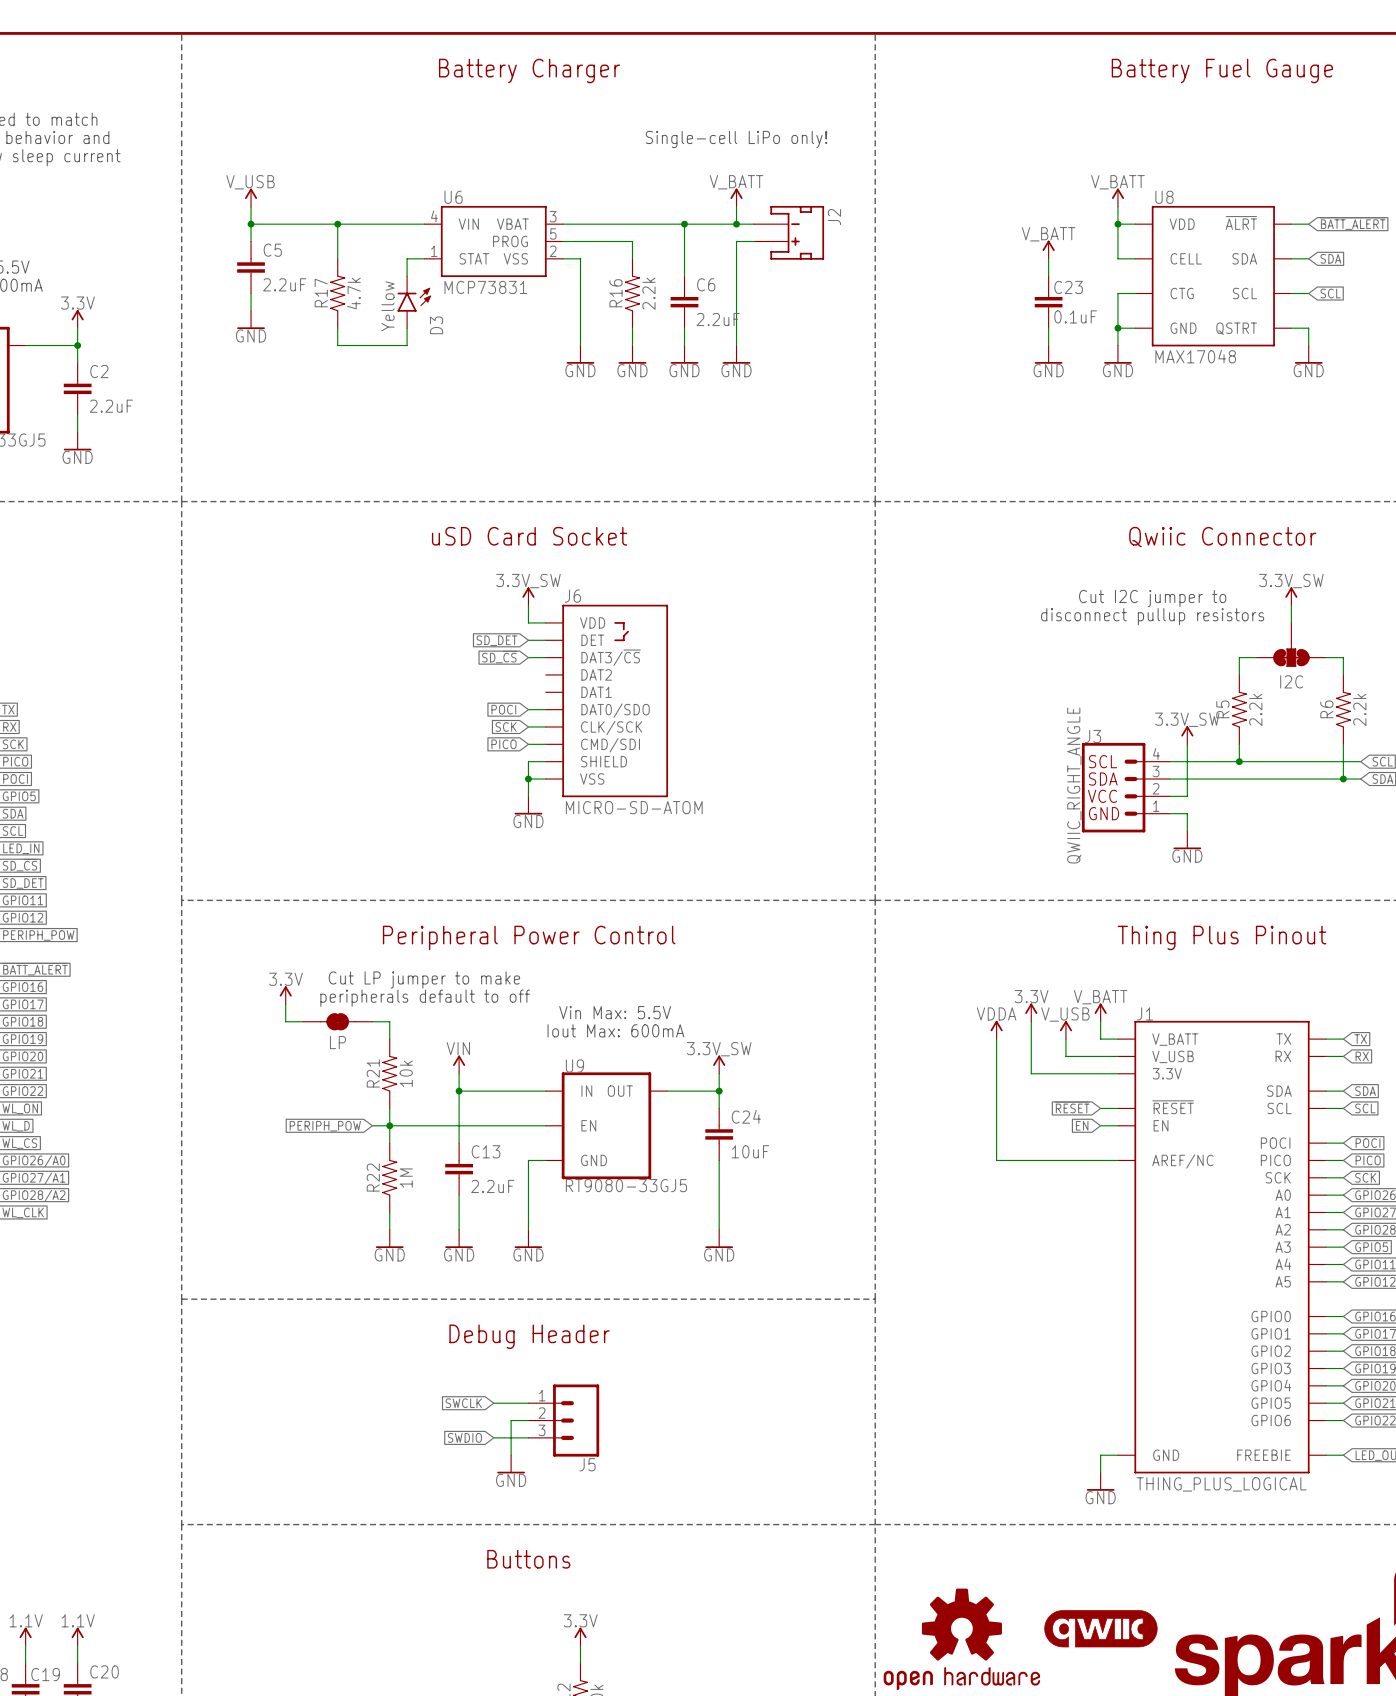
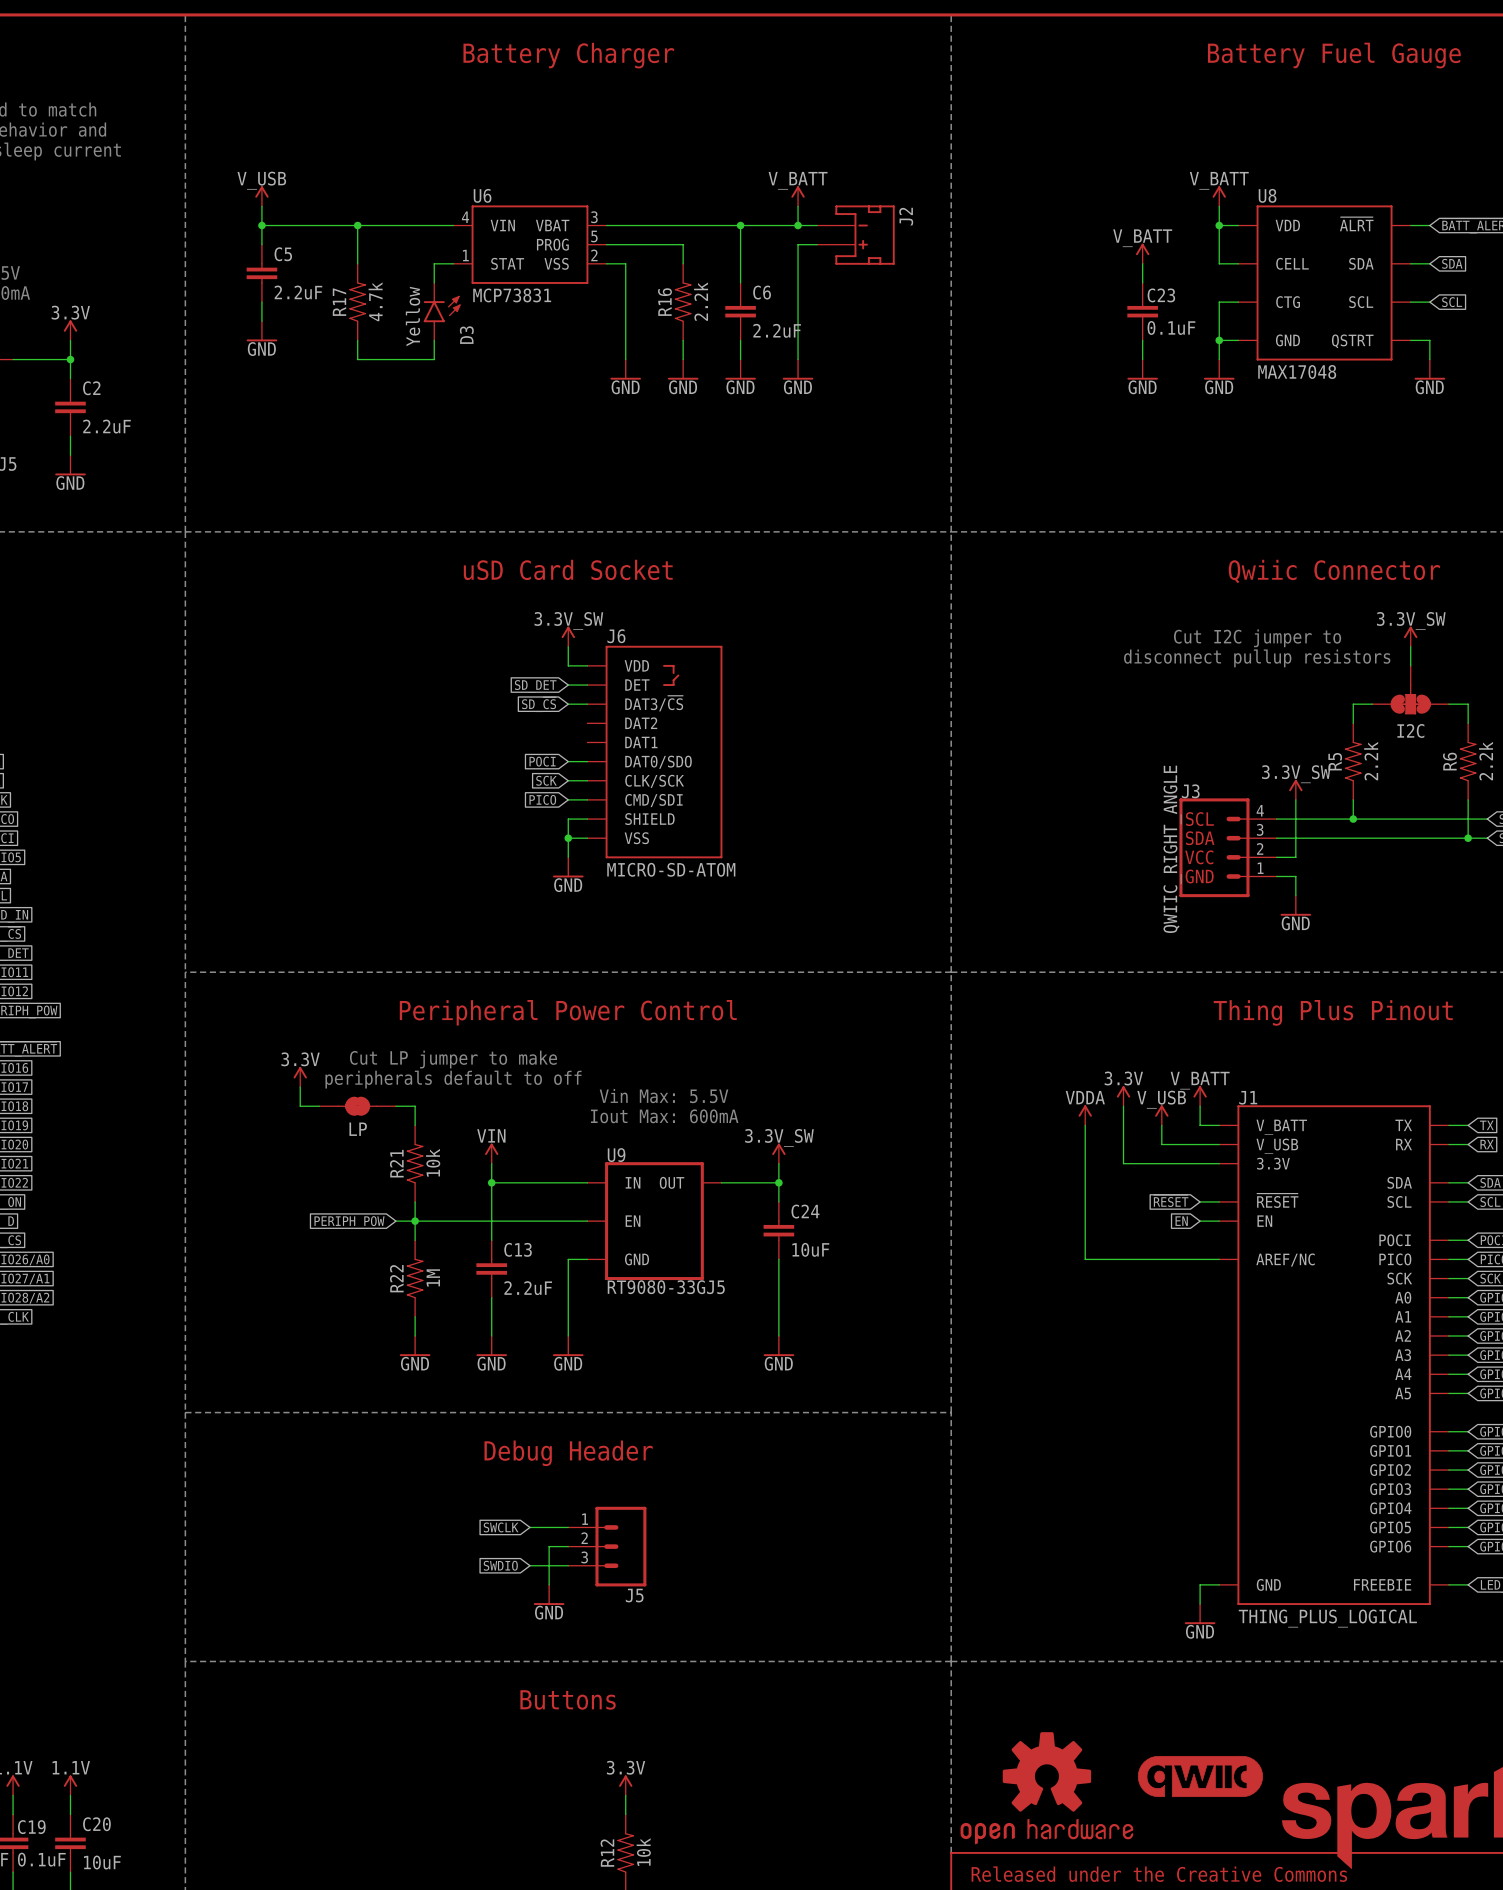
text: Single-cell LiPo only! (736, 139) -> none

